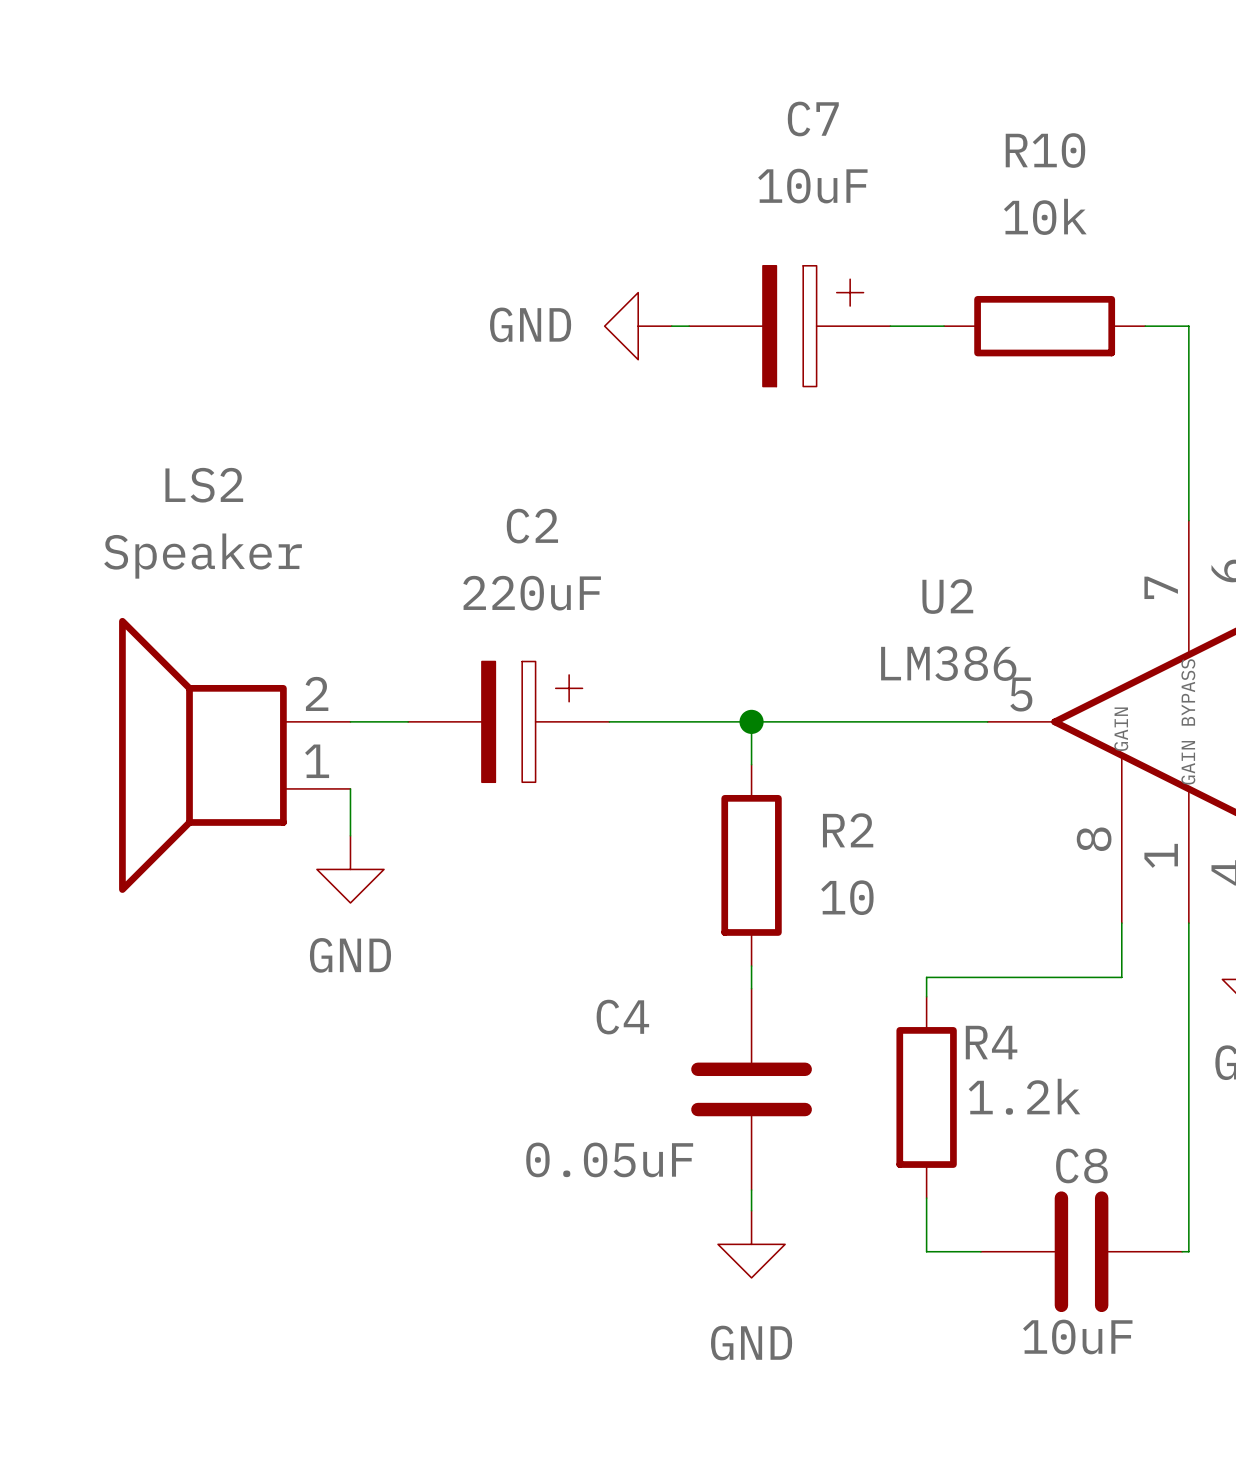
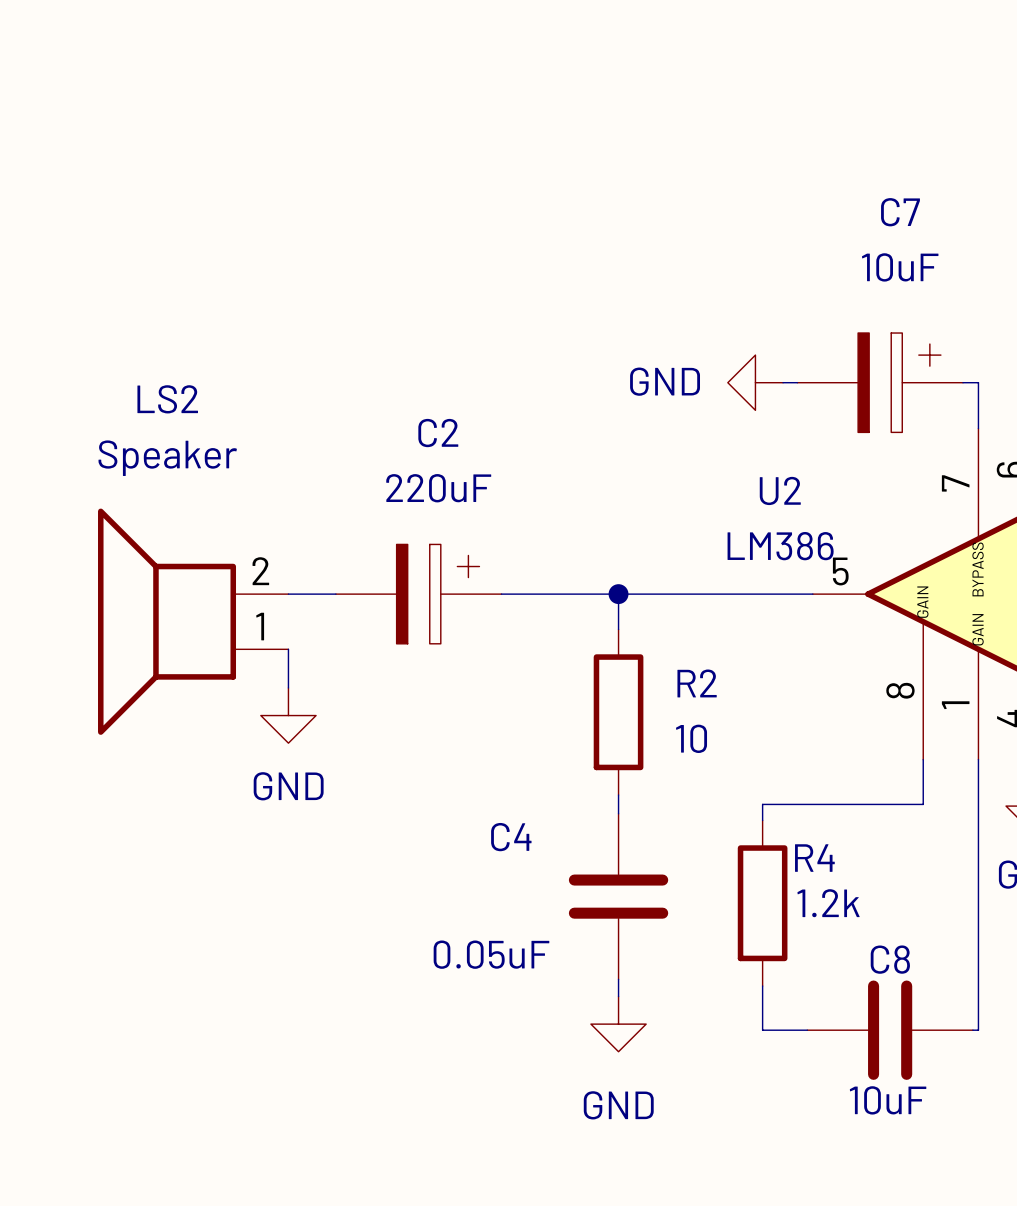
power symbol position: GND (638, 326) -> GND (755, 382)
wire: (671, 326) (689, 326) -> (783, 382) (797, 382)
C7 position: (789, 326) -> (880, 382)
wire: (890, 326) (944, 326) -> none
R10: 10k (1044, 326) -> none
wire: (1145, 326) (1188, 326) (1188, 465) -> (962, 382) (978, 382)

